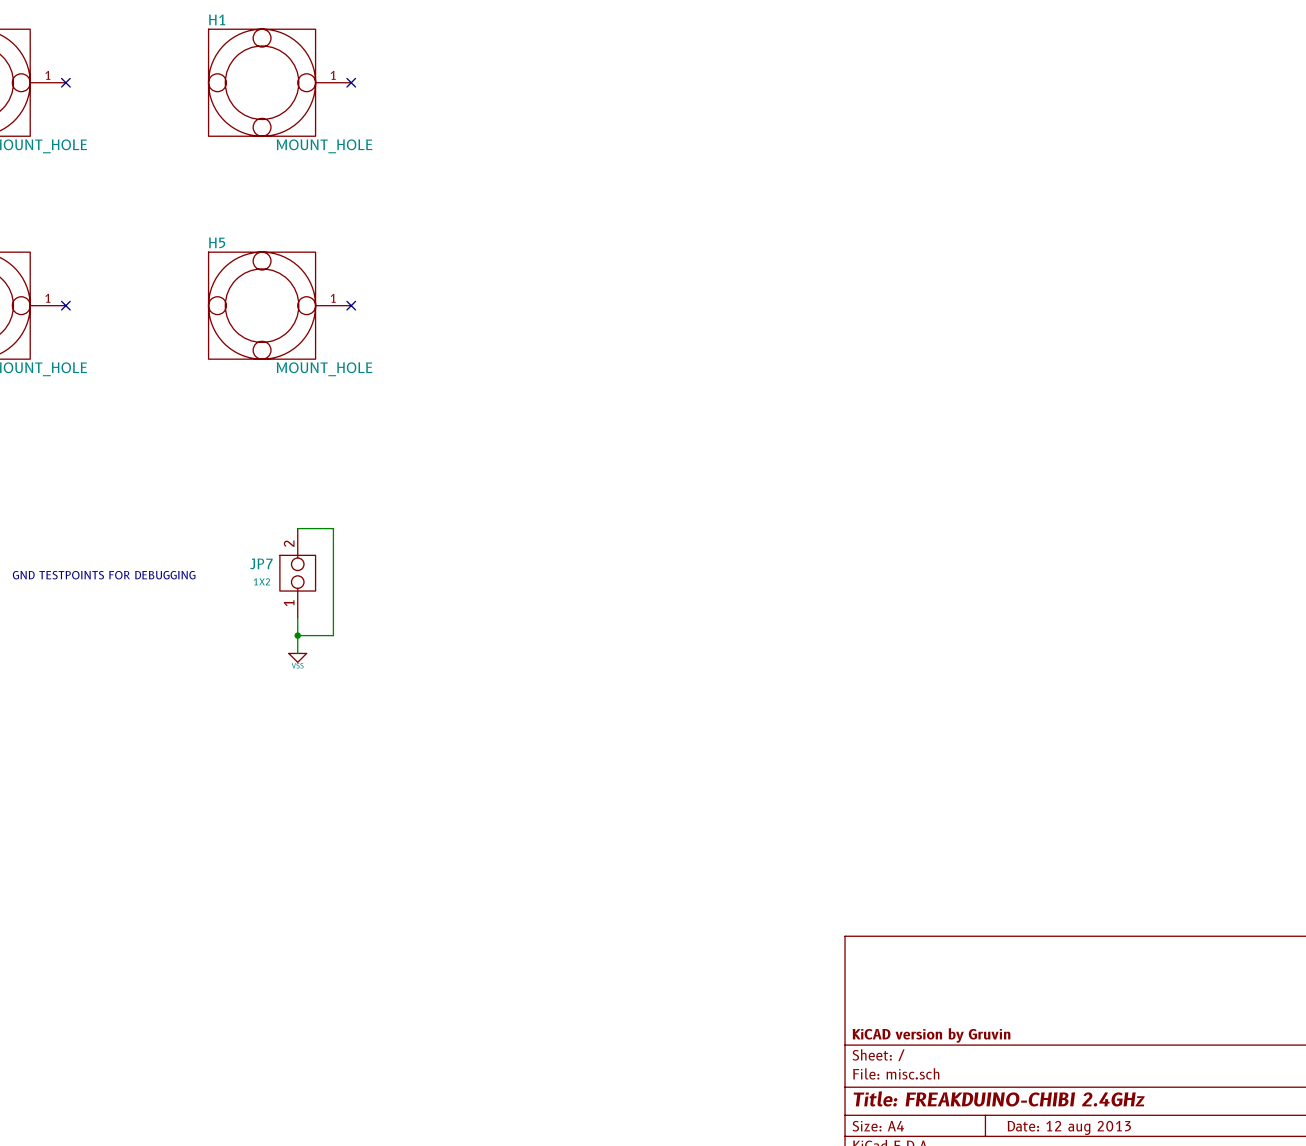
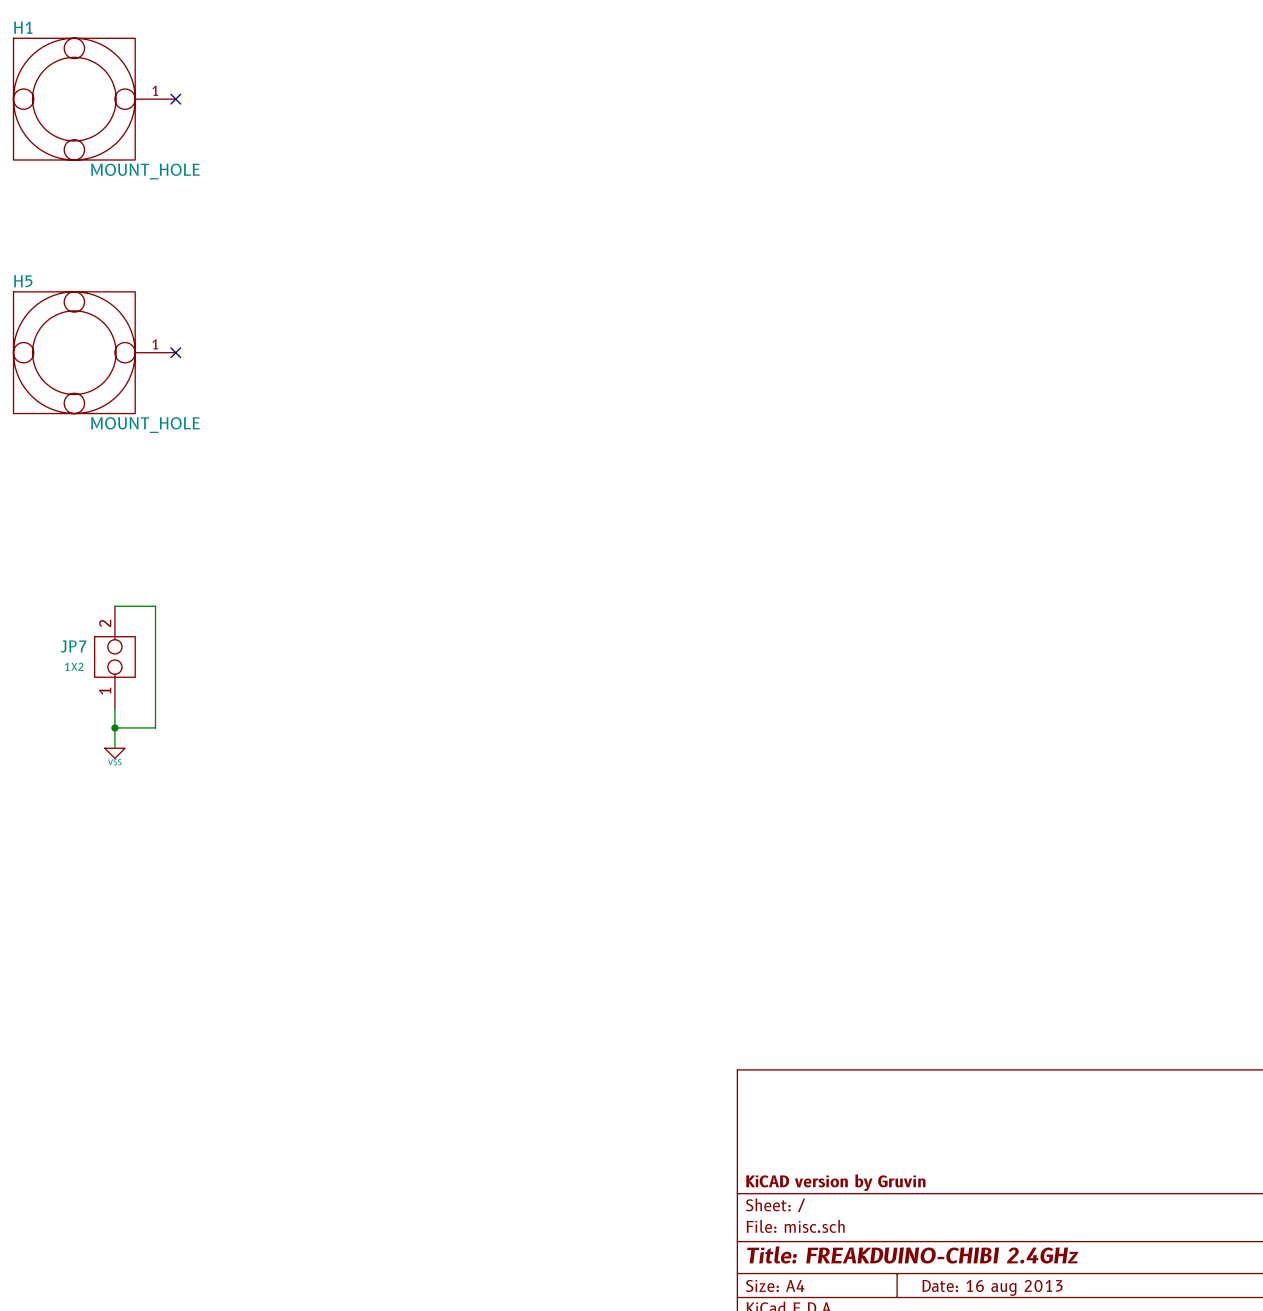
title block: Date: 12 aug 2013 (1069, 1127) -> Date: 16 aug 2013 (992, 1287)

